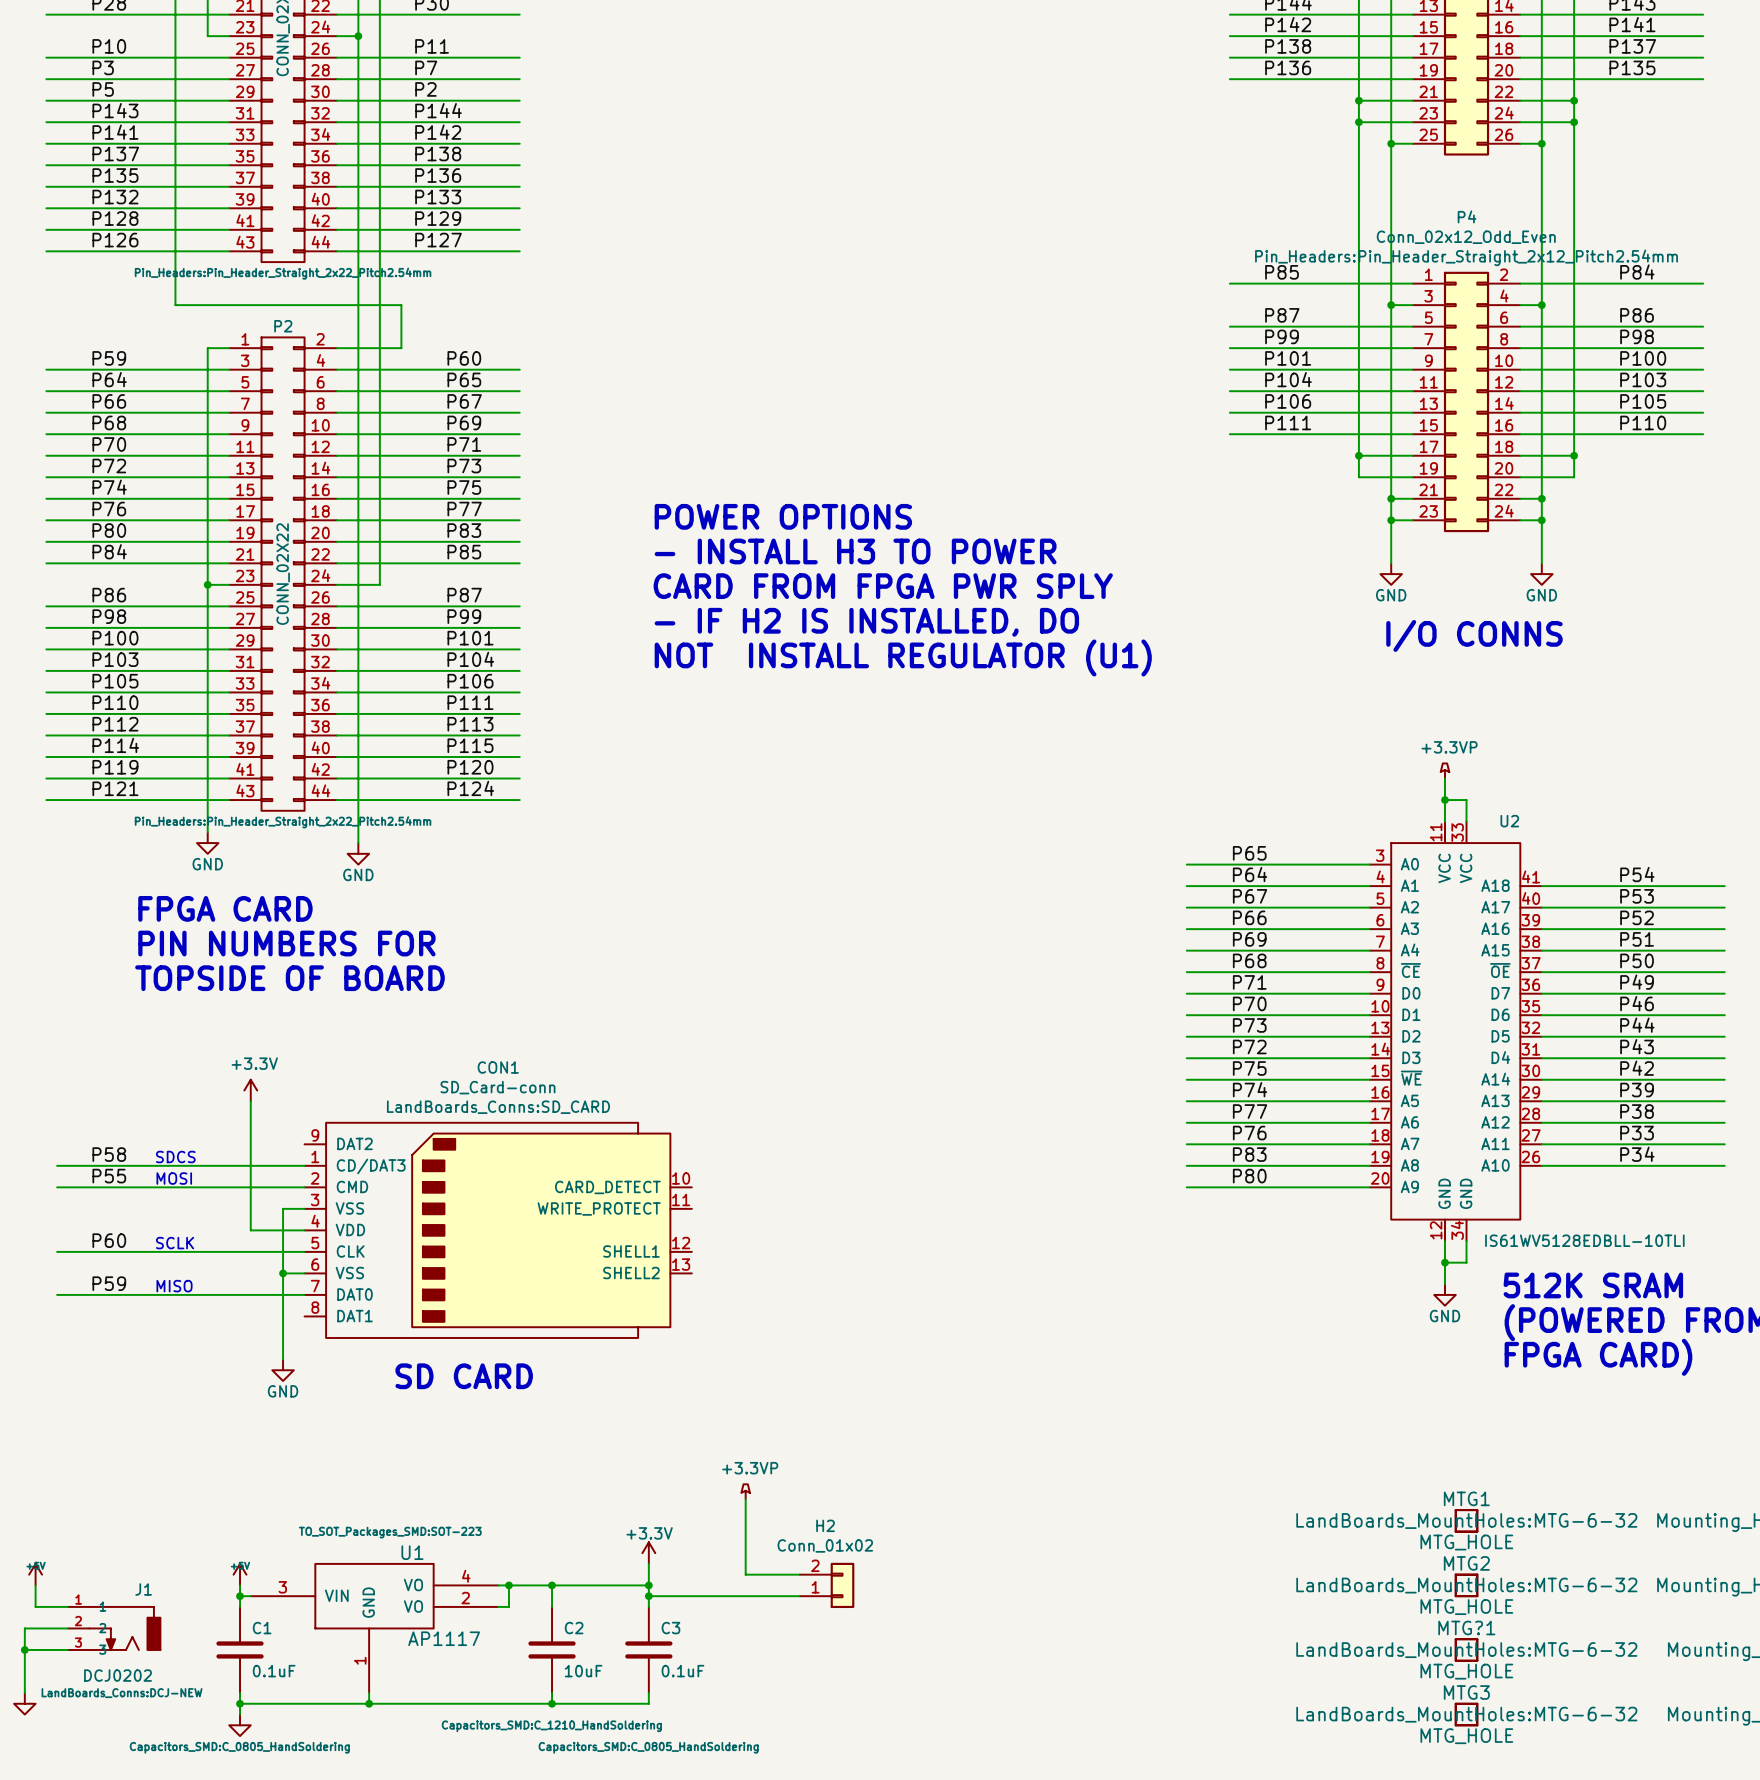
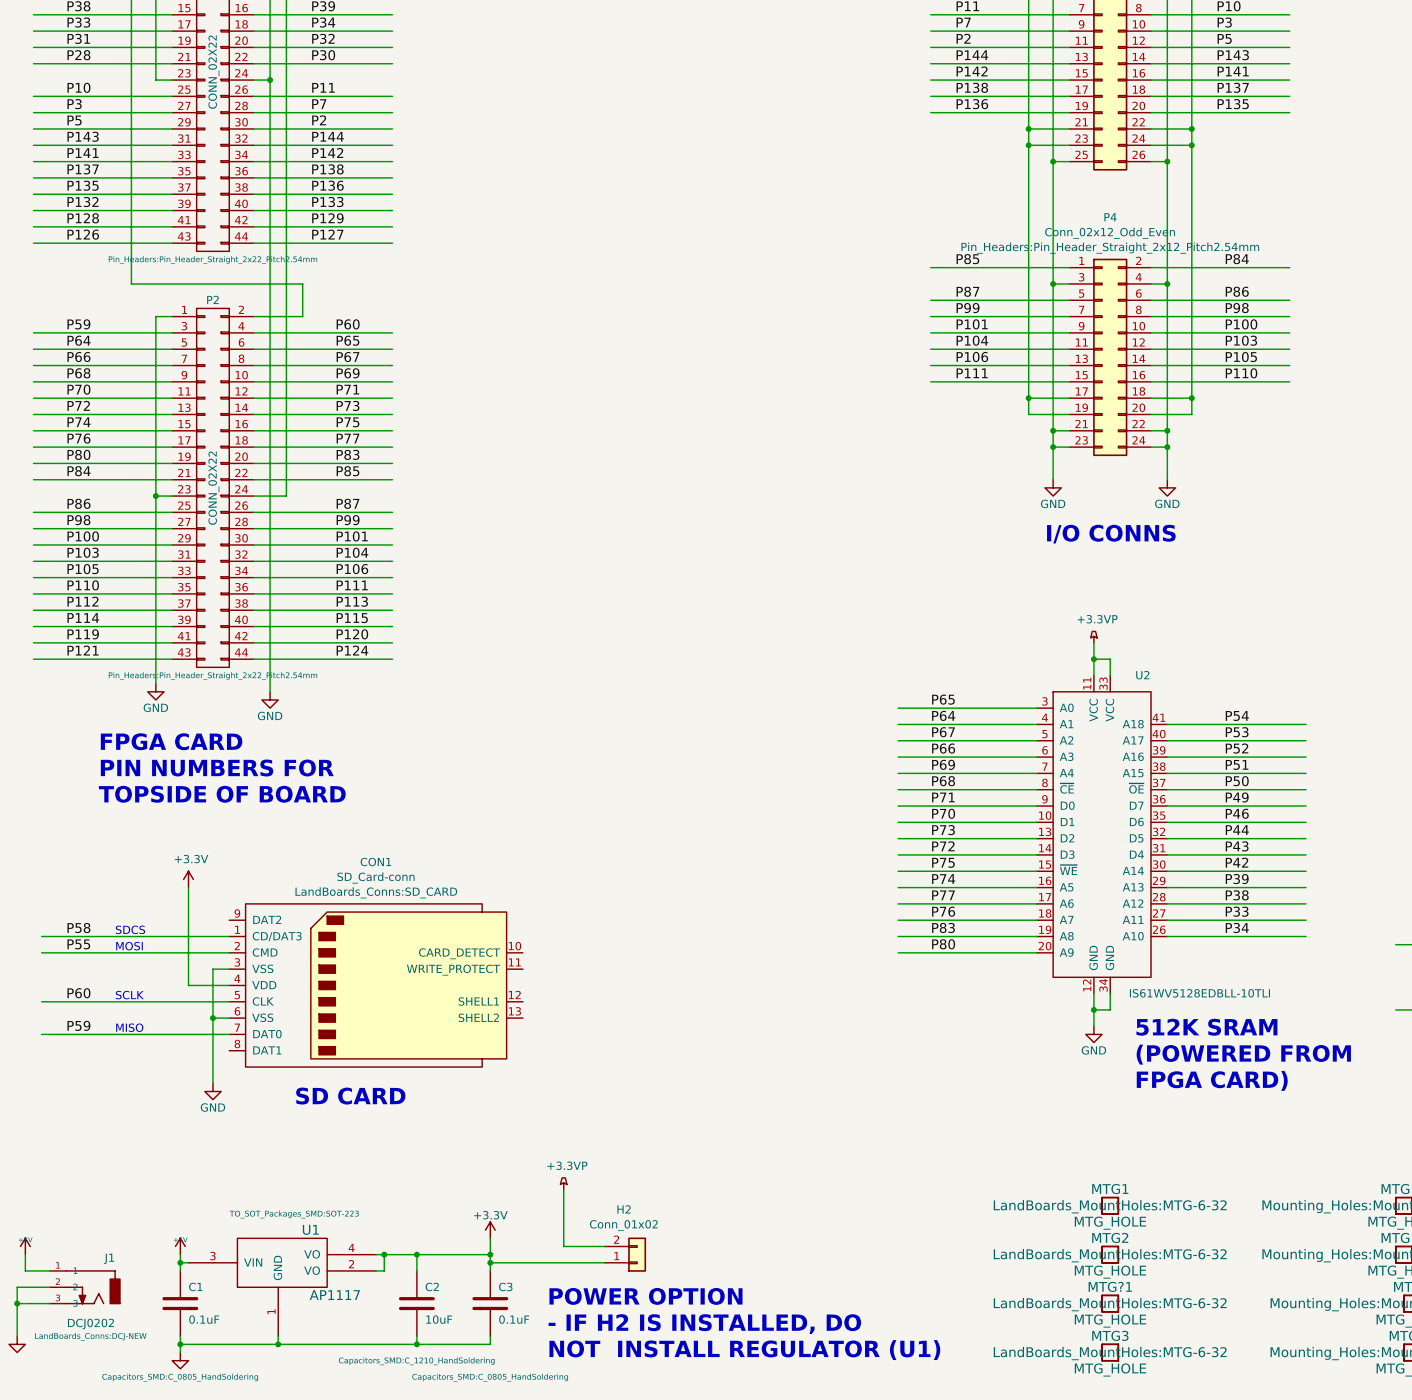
text: POWER OPTIONS (783, 516) -> none
text: - INSTALL H3 TO POWER (855, 551) -> none
text: CARD FROM FPGA PWR SPLY (883, 586) -> none
text: - IF H2 IS INSTALLED, DO (866, 622) -> none
text: NOT INSTALL REGULATOR (U1) (903, 657) -> none
text: none -> POWER OPTION (645, 1296)
text: none -> - IF H2 IS INSTALLED, DO (704, 1324)
text: none -> NOT INSTALL REGULATOR (U1) (744, 1350)

